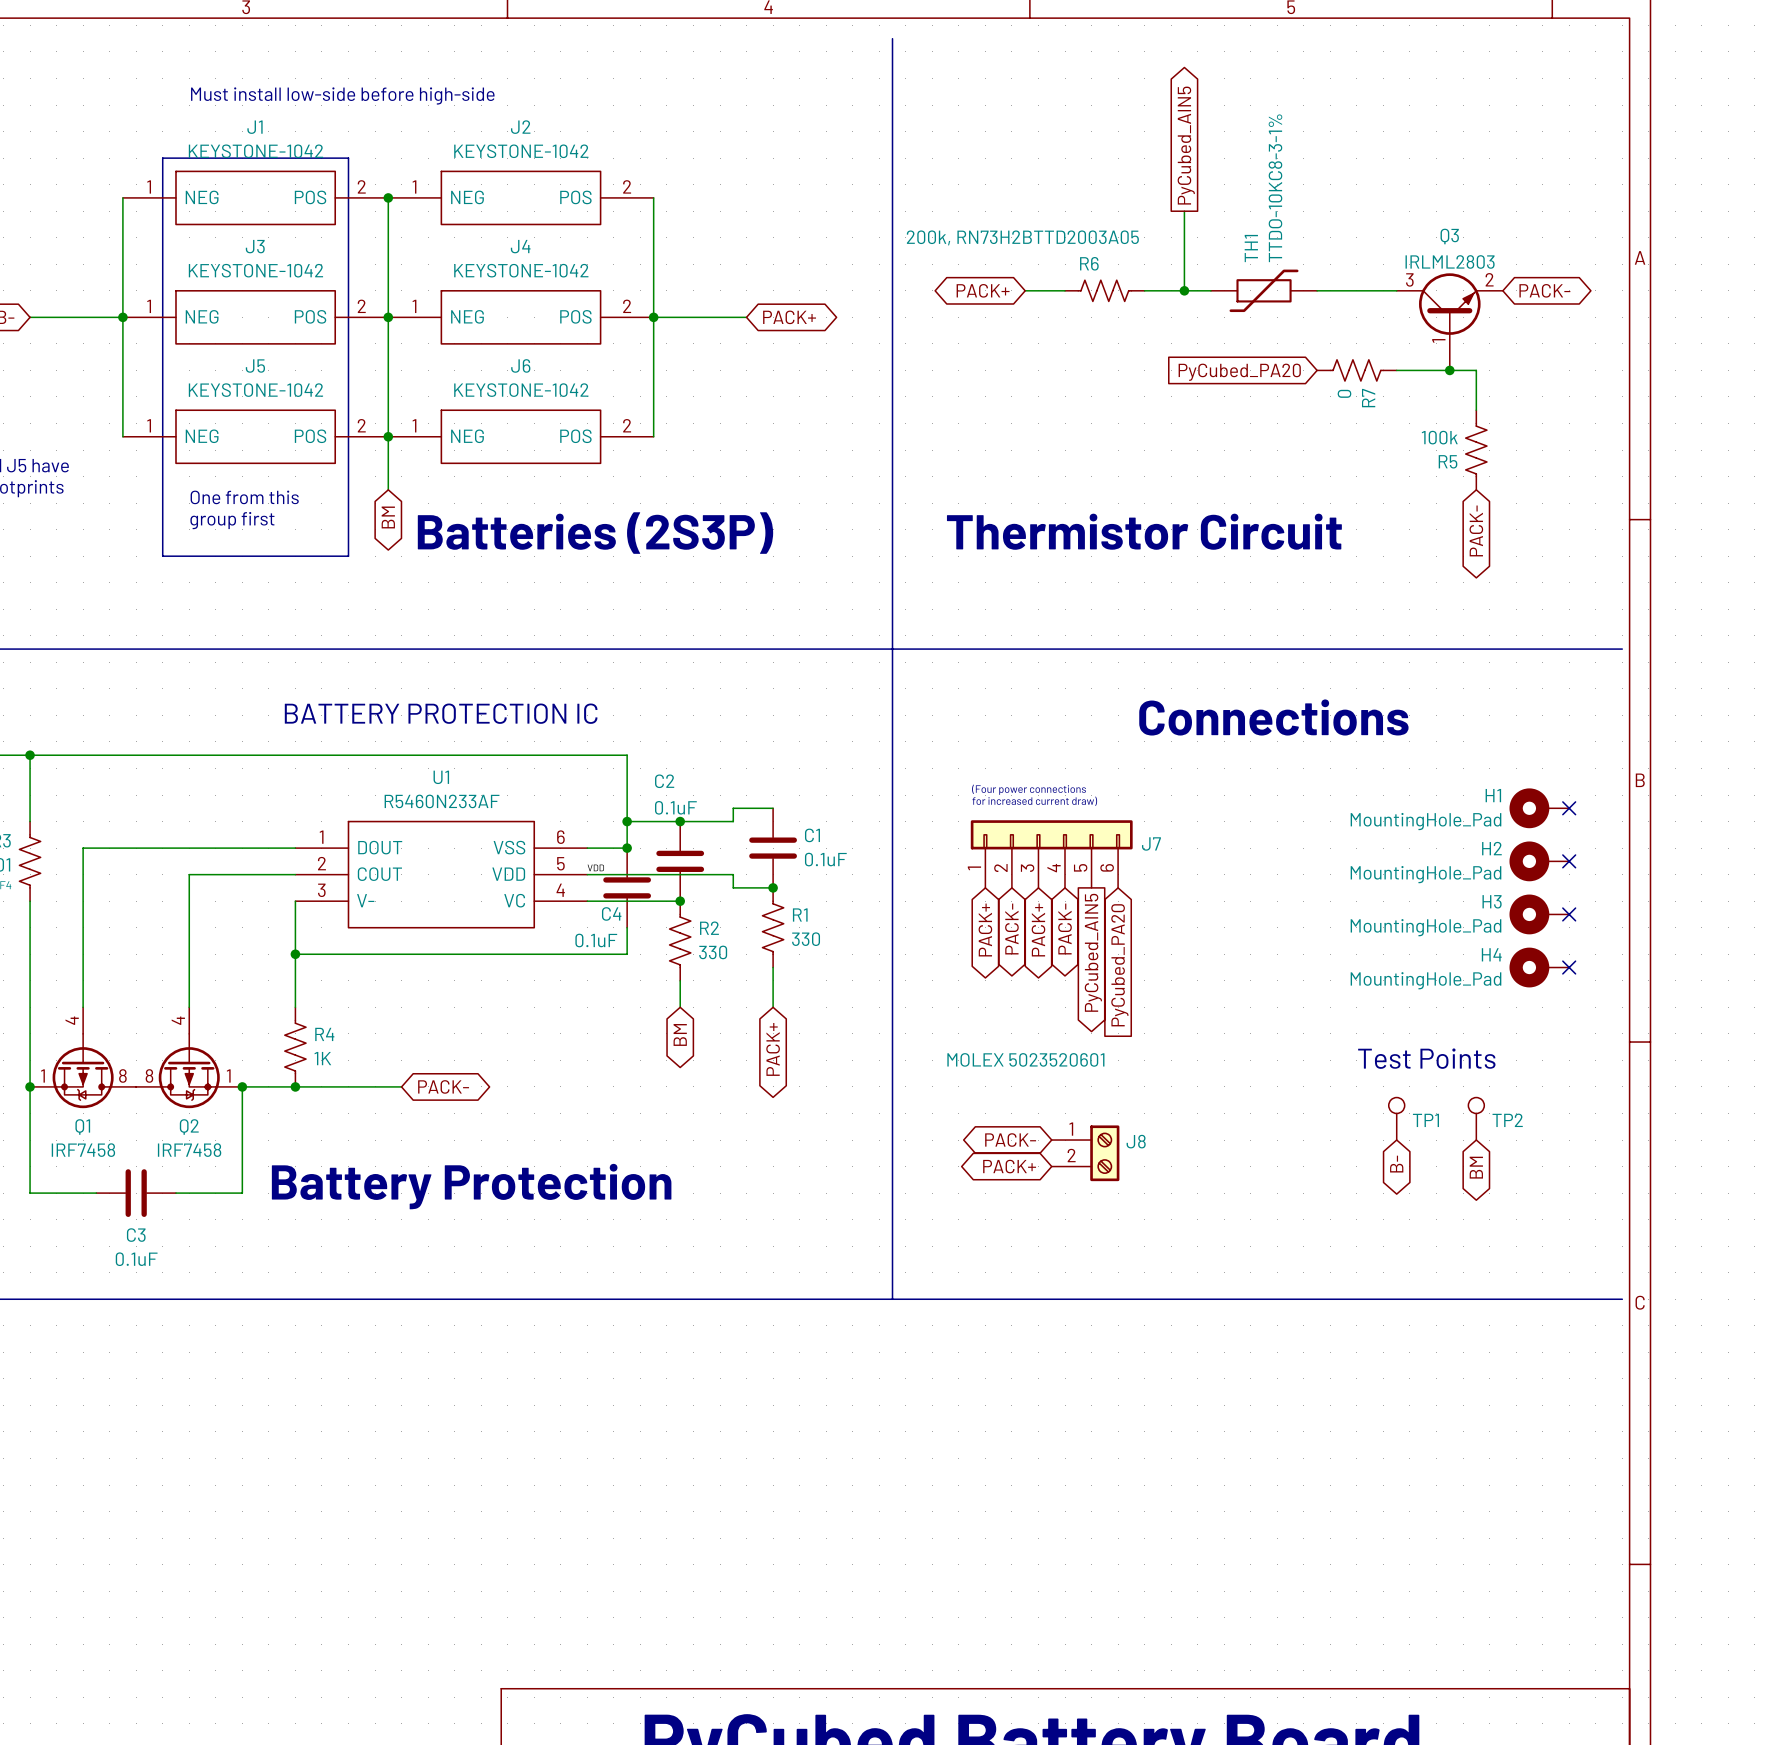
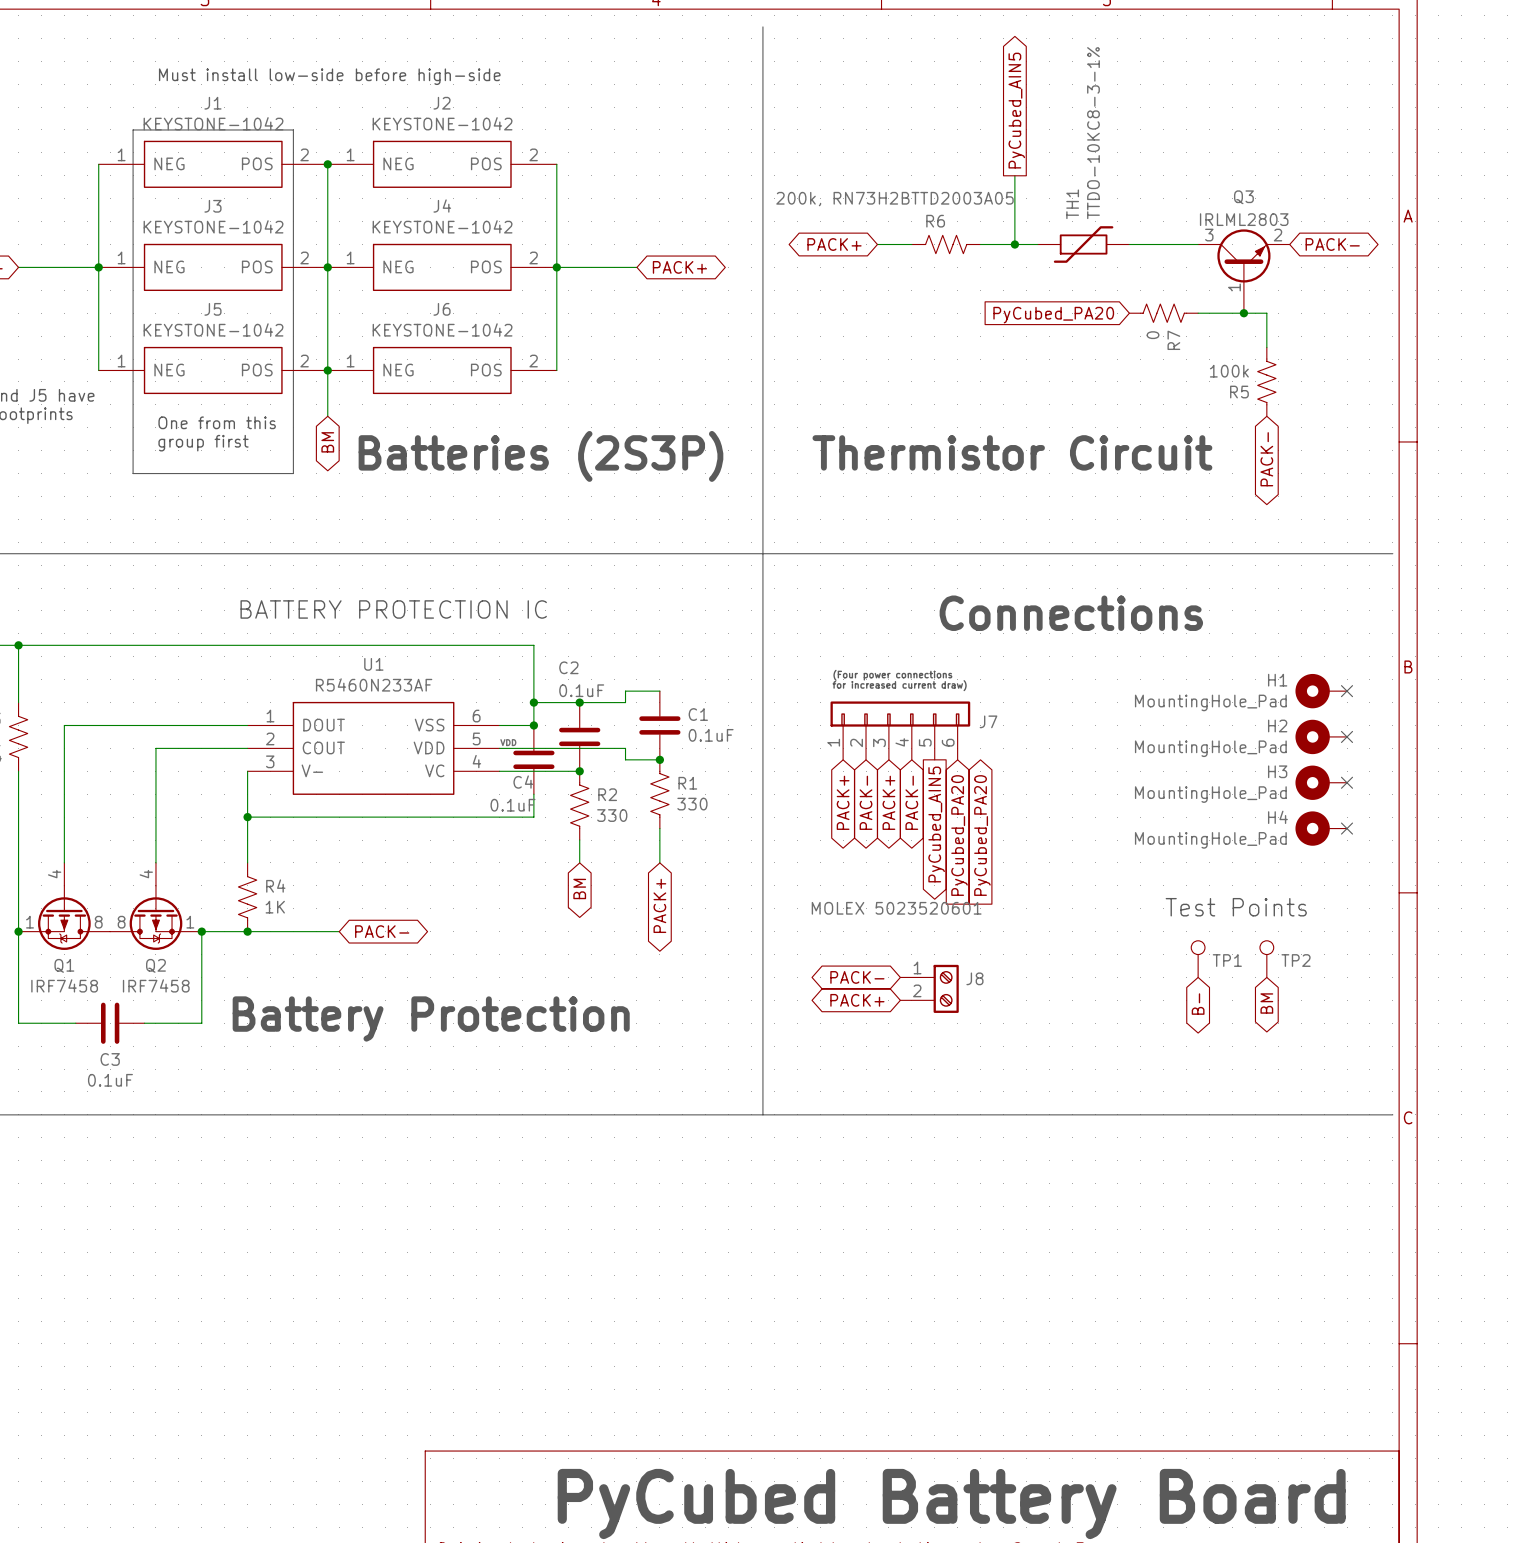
global label: none -> PyCubed_PA20 (982, 835)

